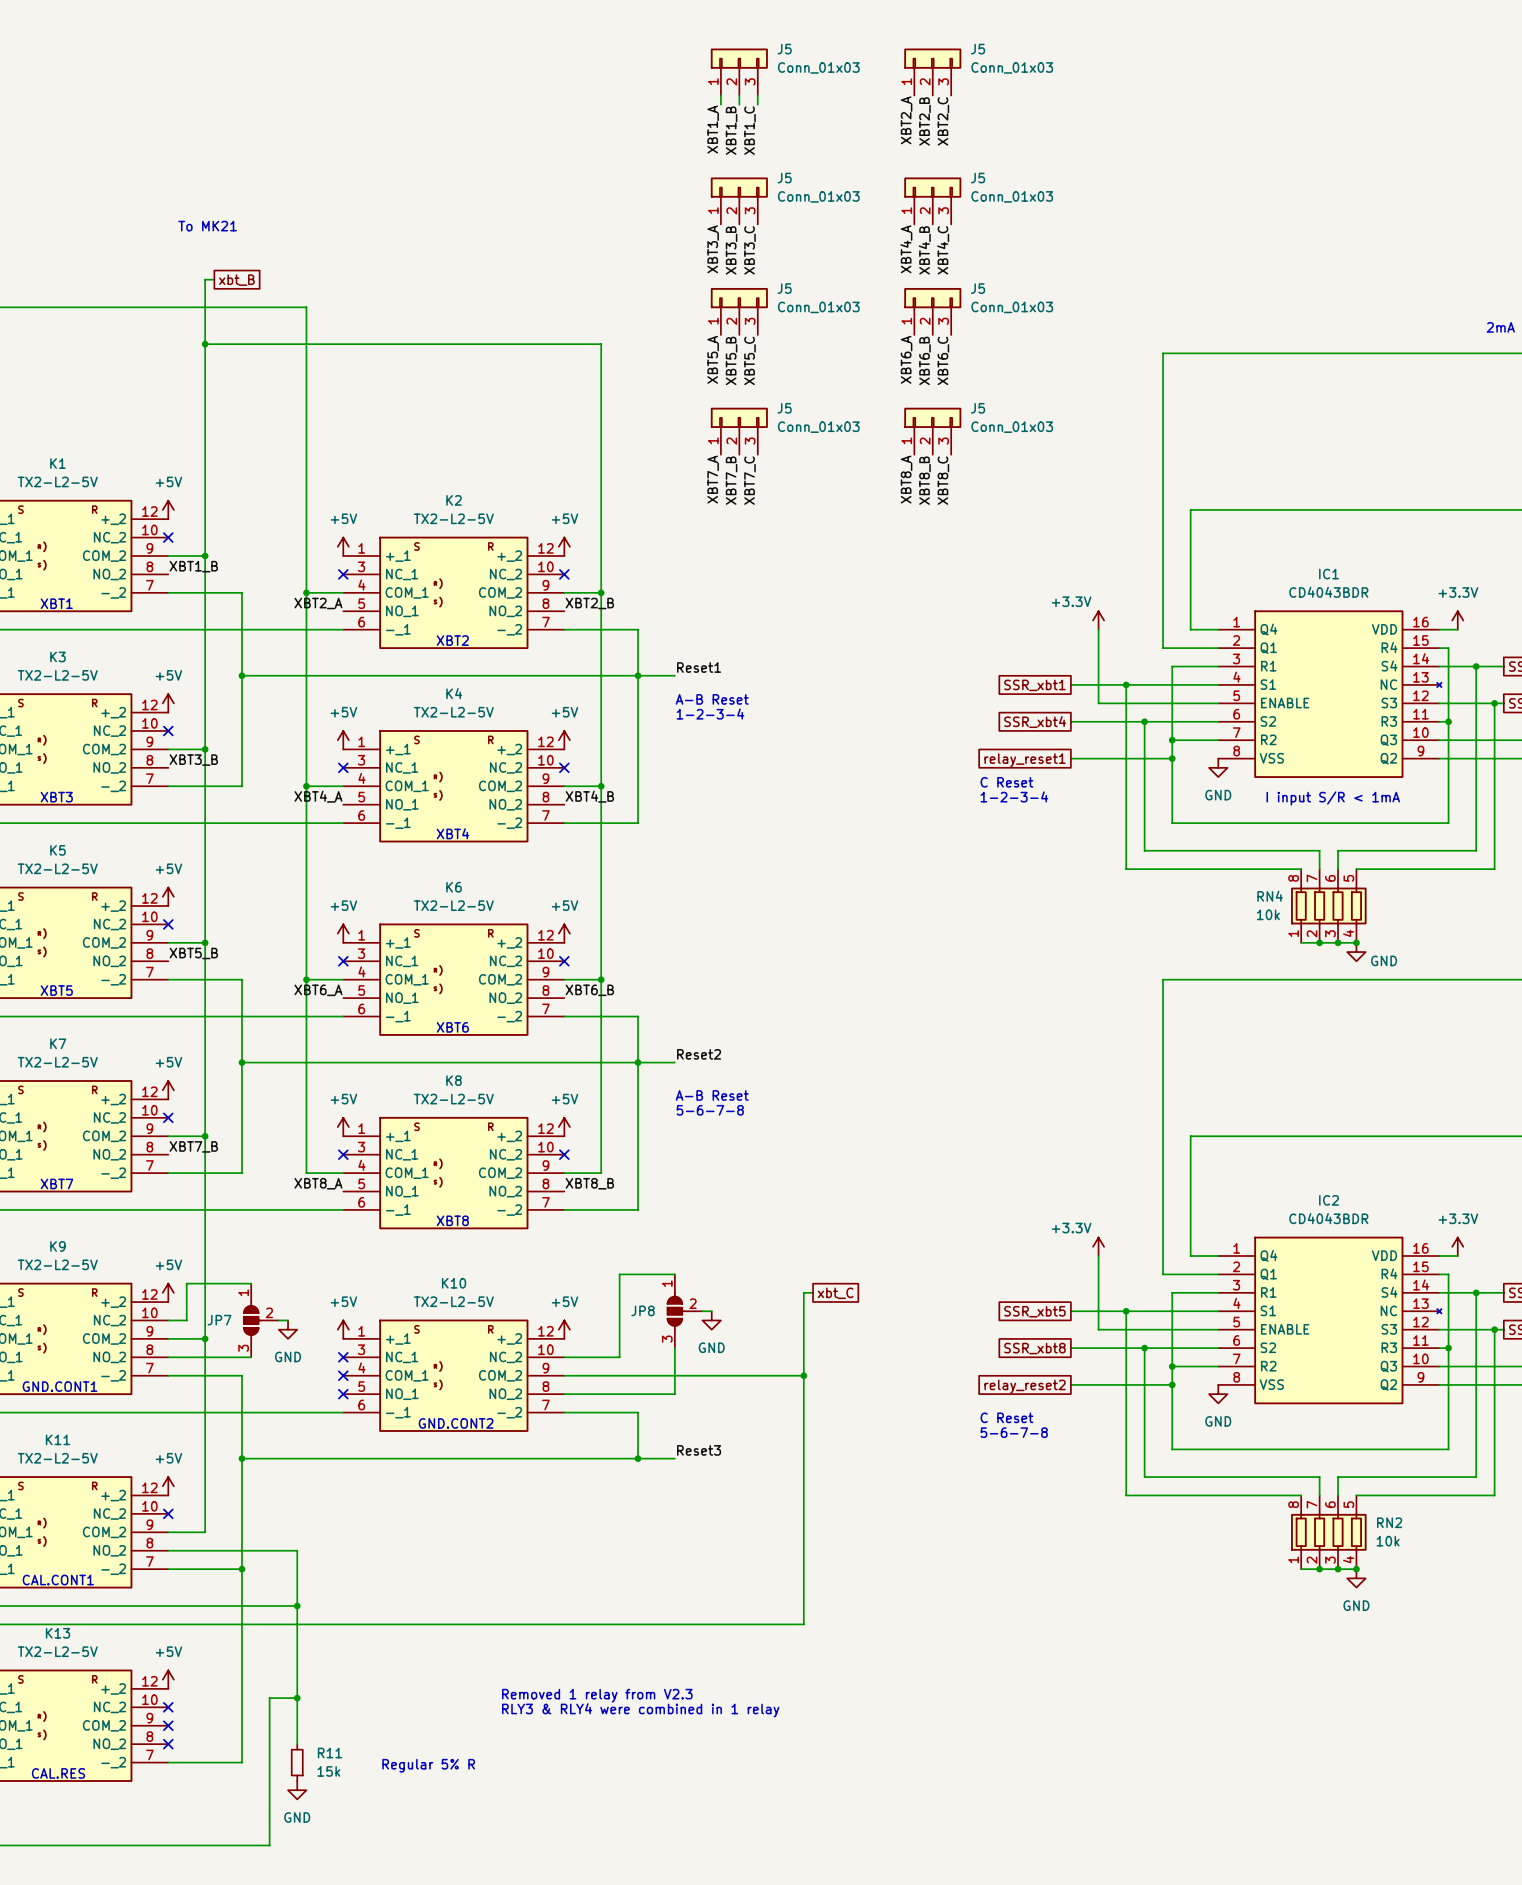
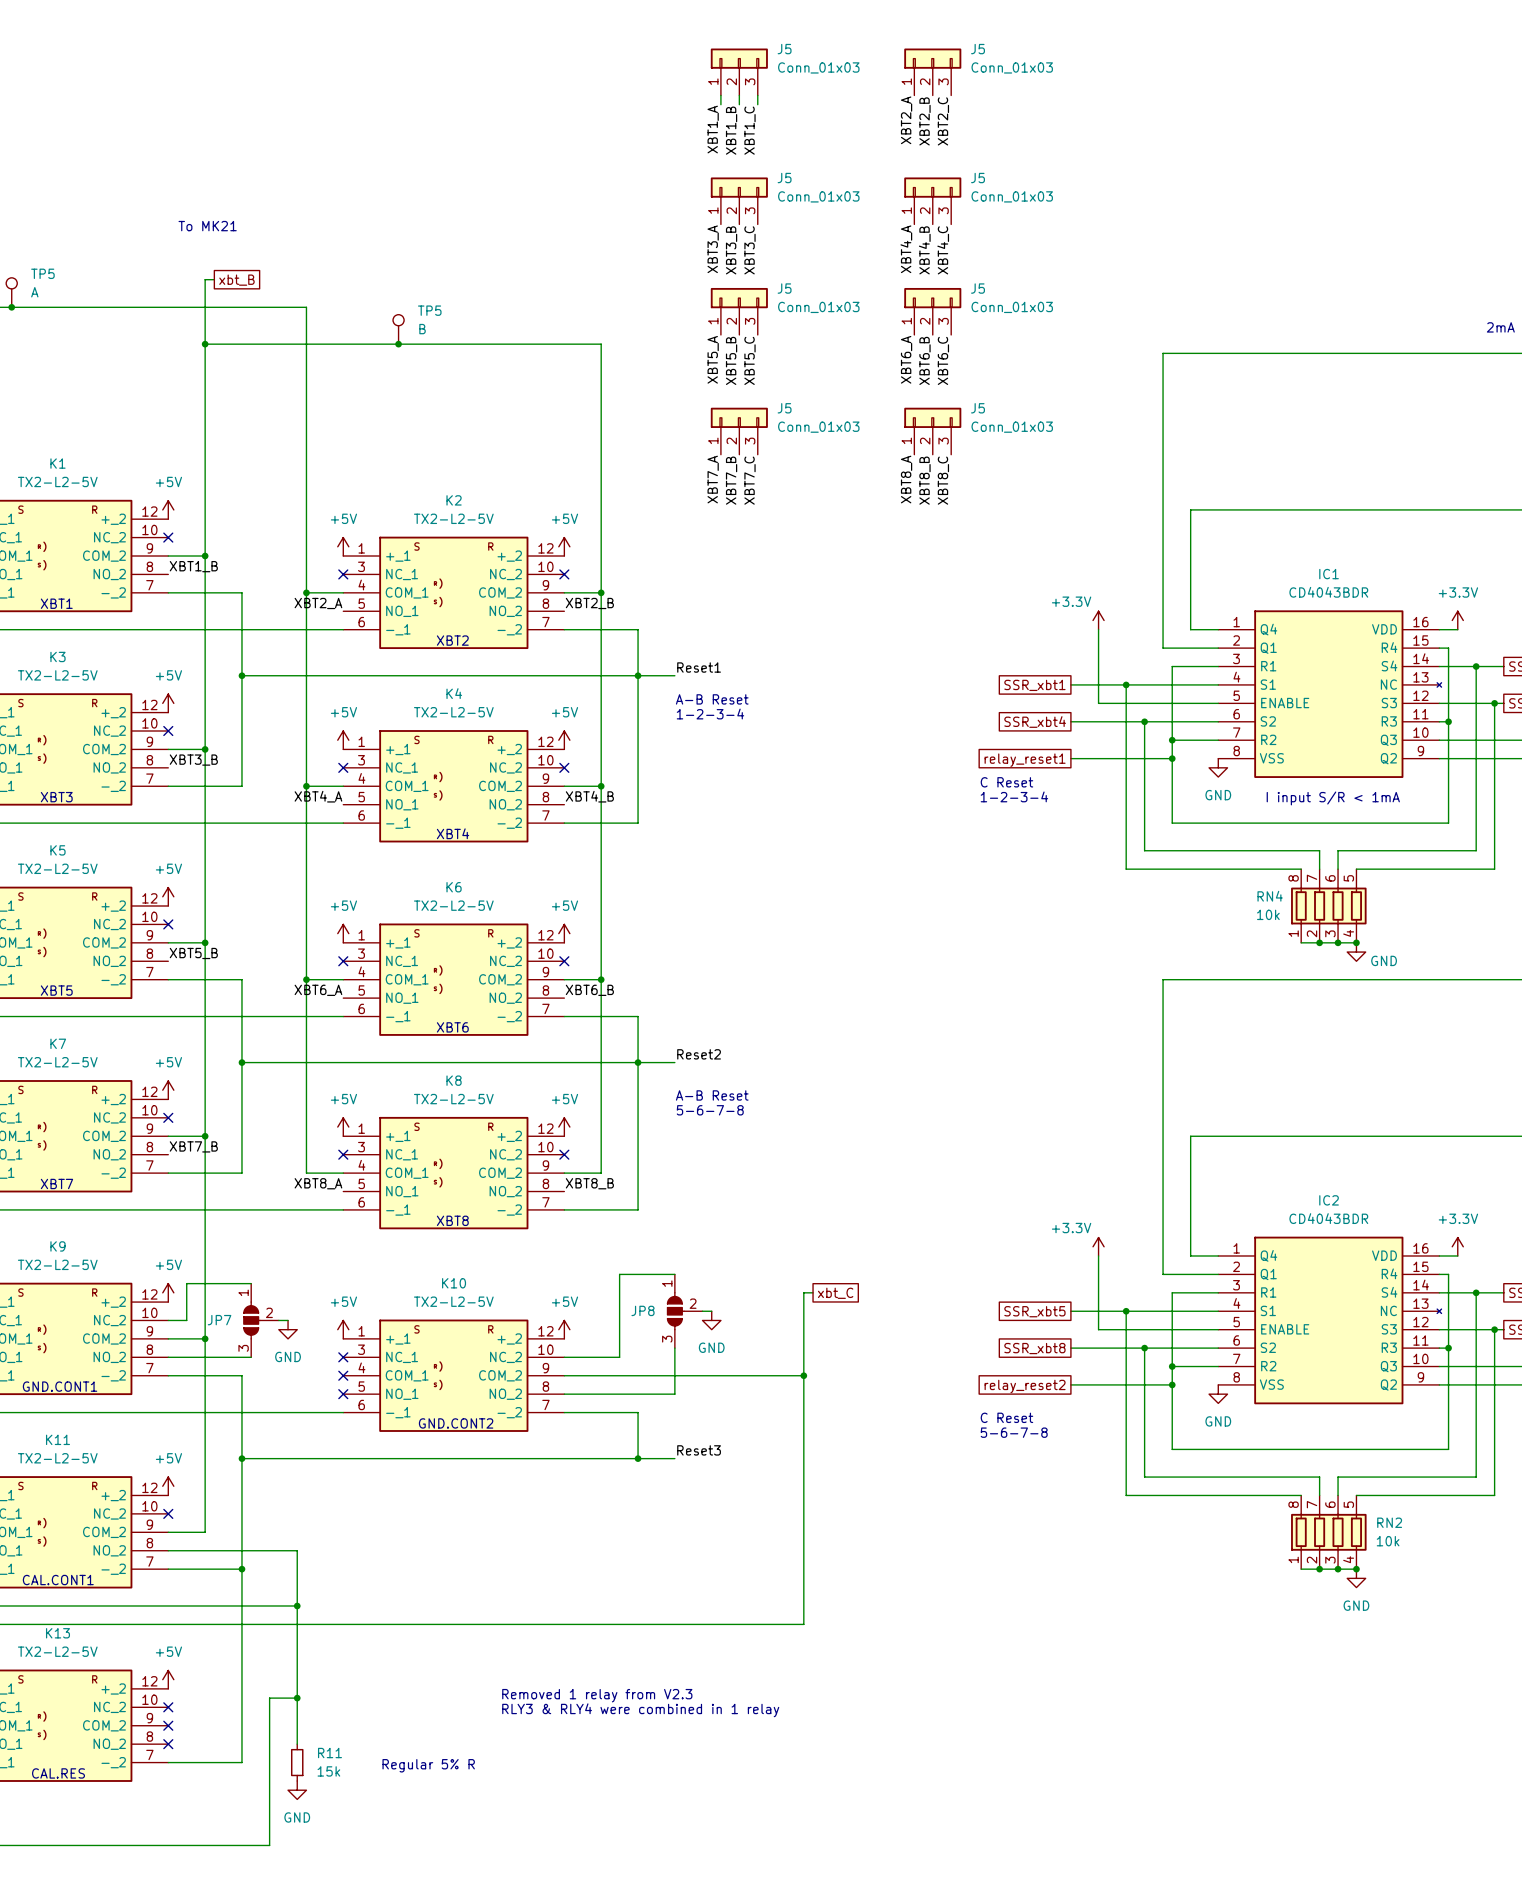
TP5: none -> A (11, 292)
junction: none -> (11, 307)
TP5: none -> B (398, 329)
junction: none -> (398, 344)

